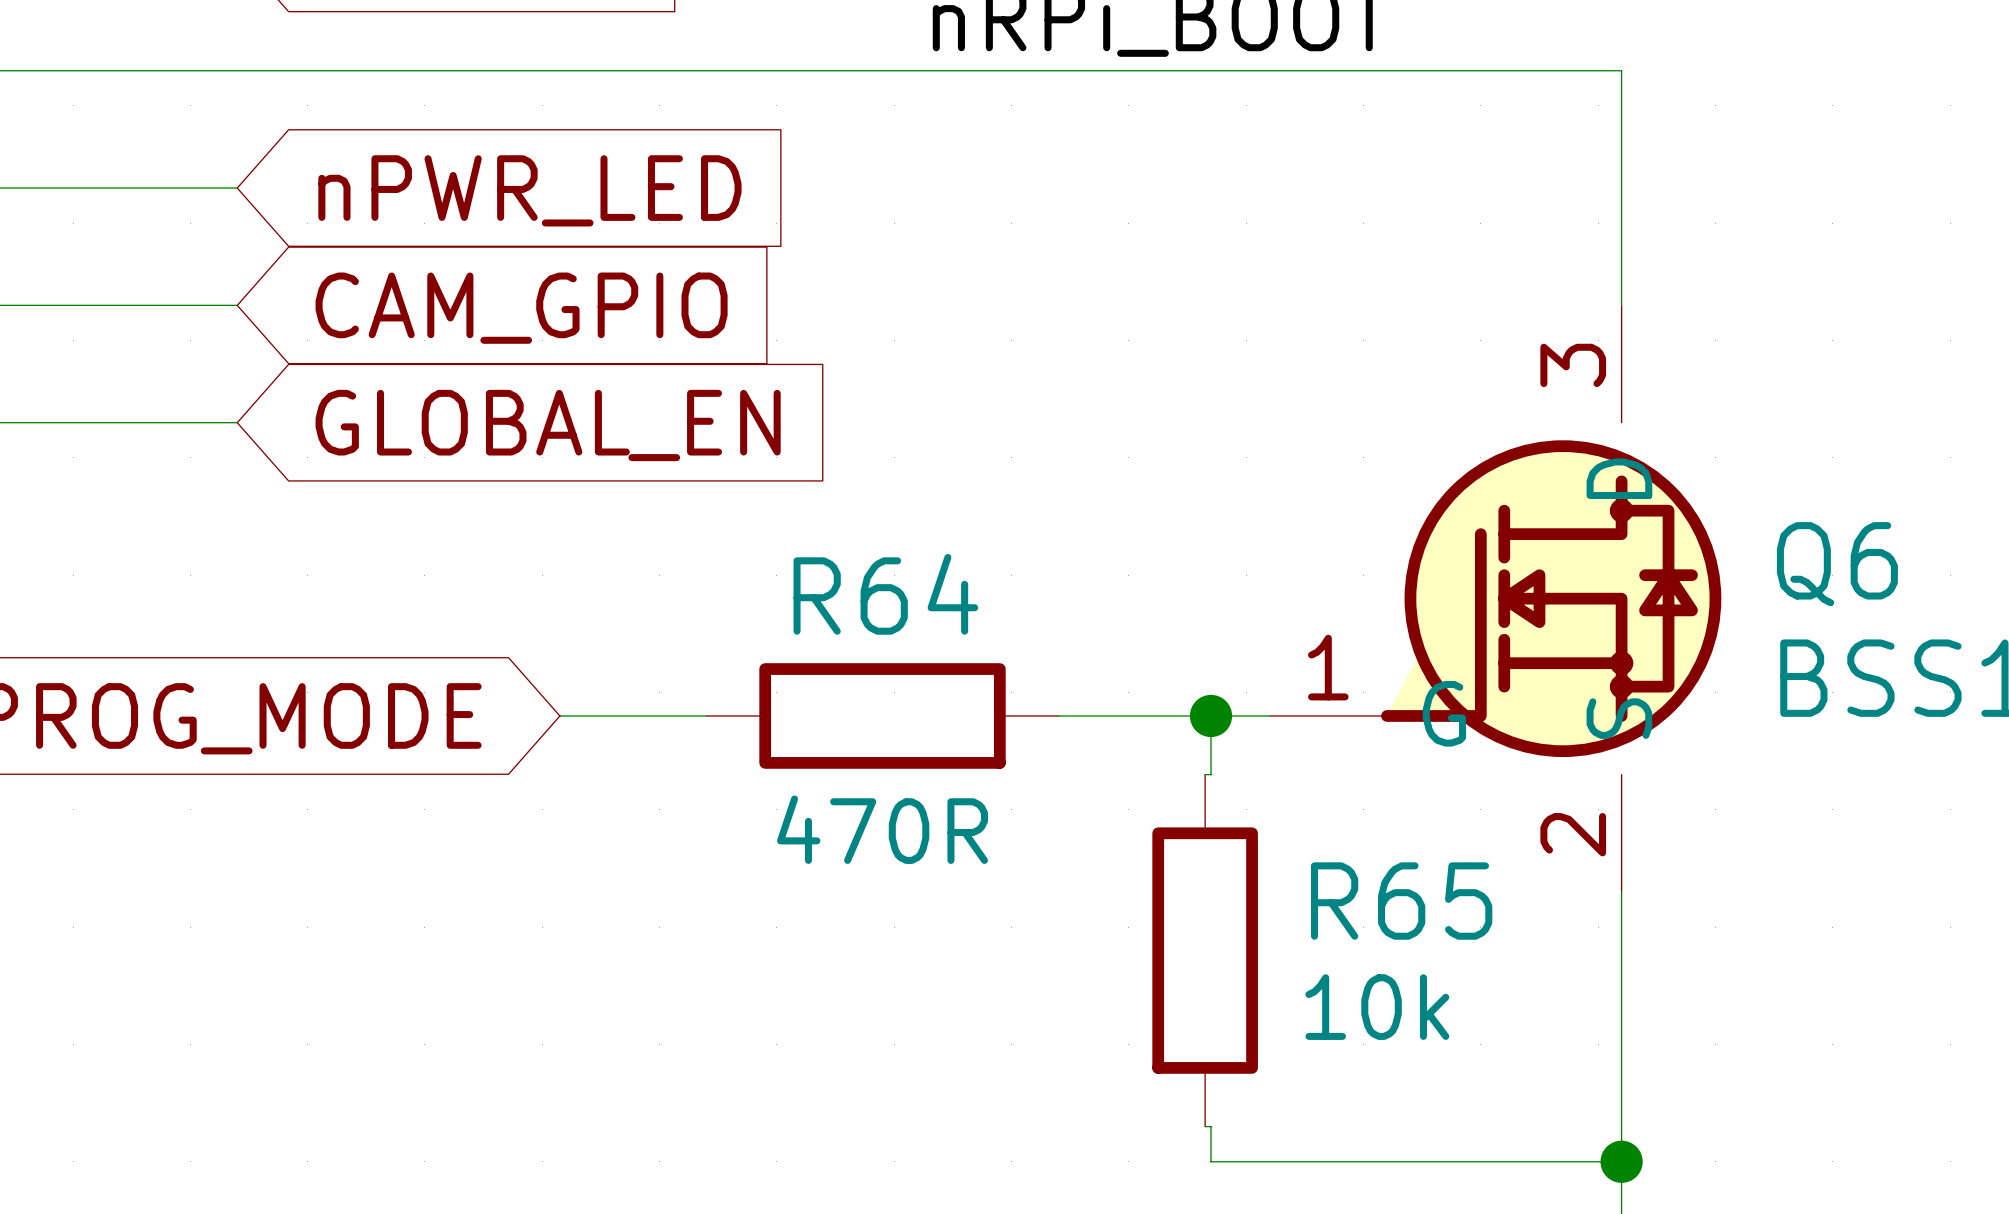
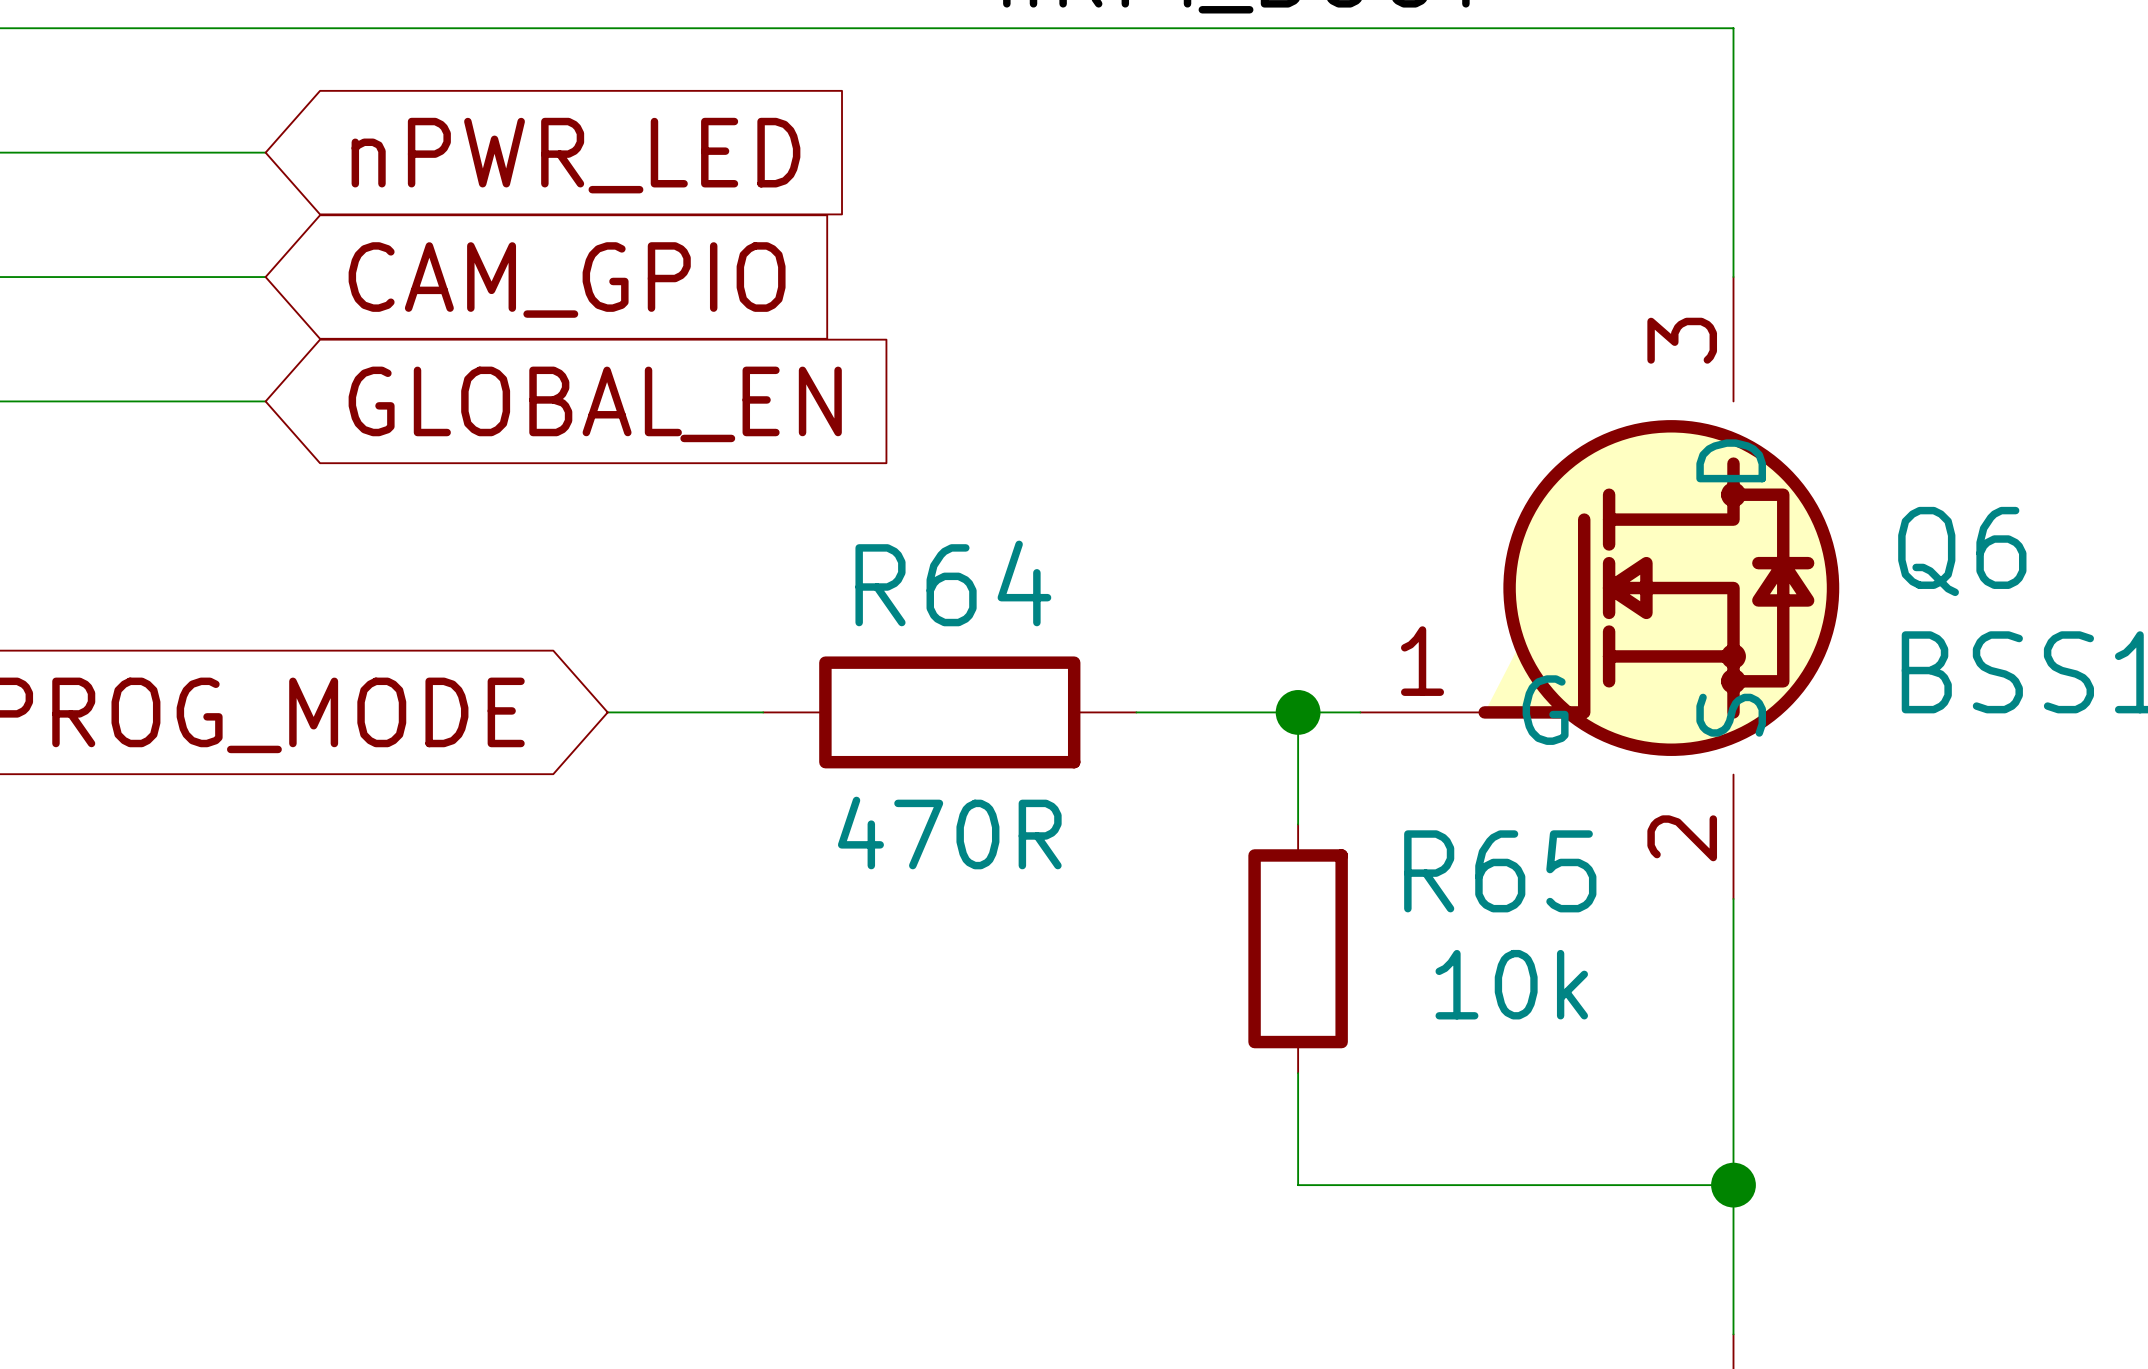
R65 symbol: [1152, 774, 1258, 1127] -> [1248, 824, 1348, 1074]
wire: (1205, 774) (1211, 774) -> (1298, 824) (1298, 774)
wire: (1205, 1126) (1211, 1126) -> (1298, 1073) (1298, 1147)

